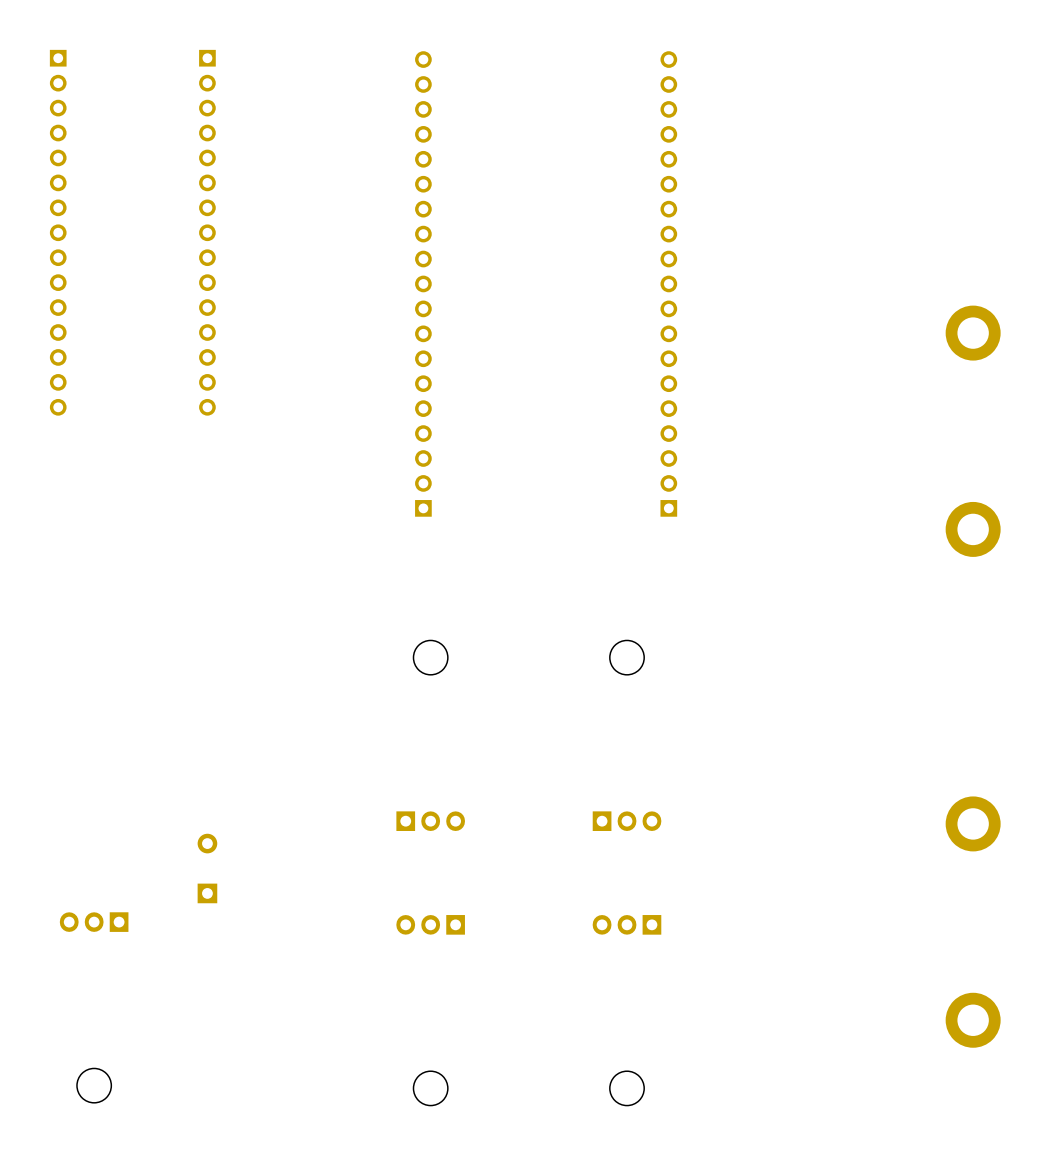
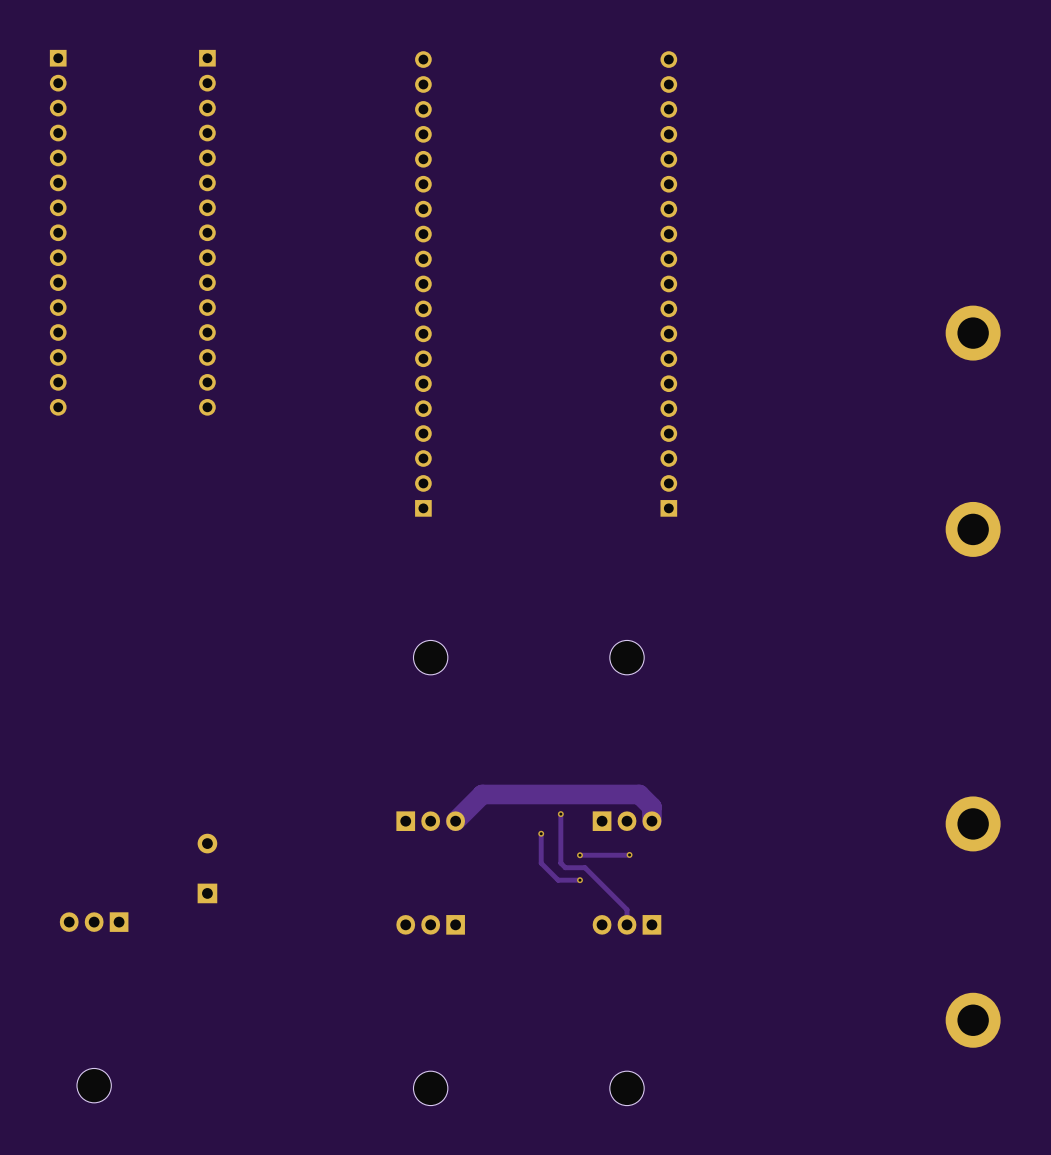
track: none -> (560, 814) (560, 863) (565, 867) (584, 867) (627, 909) (627, 924)
via: none -> (560, 814)
track: none -> (651, 821) (651, 807) (639, 794) (482, 794) (455, 821)
track: none -> (541, 833) (541, 863) (558, 880) (579, 880)
via: none -> (541, 833)
track: none -> (629, 854) (579, 855)
via: none -> (629, 854)
via: none -> (579, 855)
via: none -> (579, 880)

